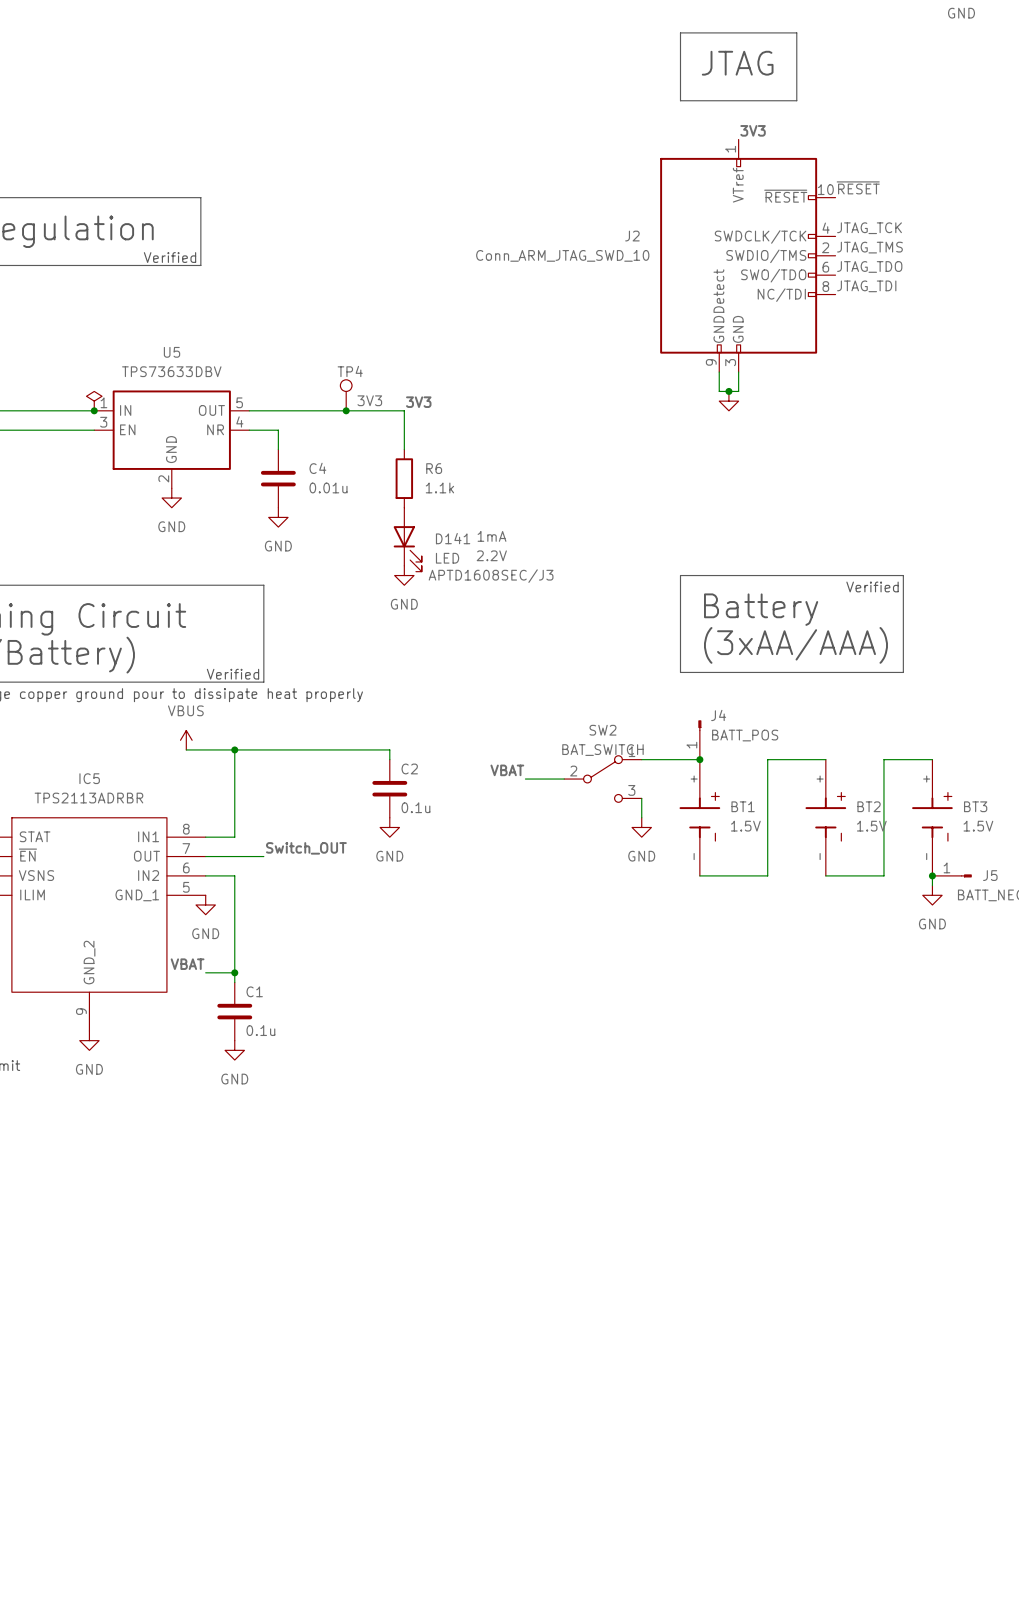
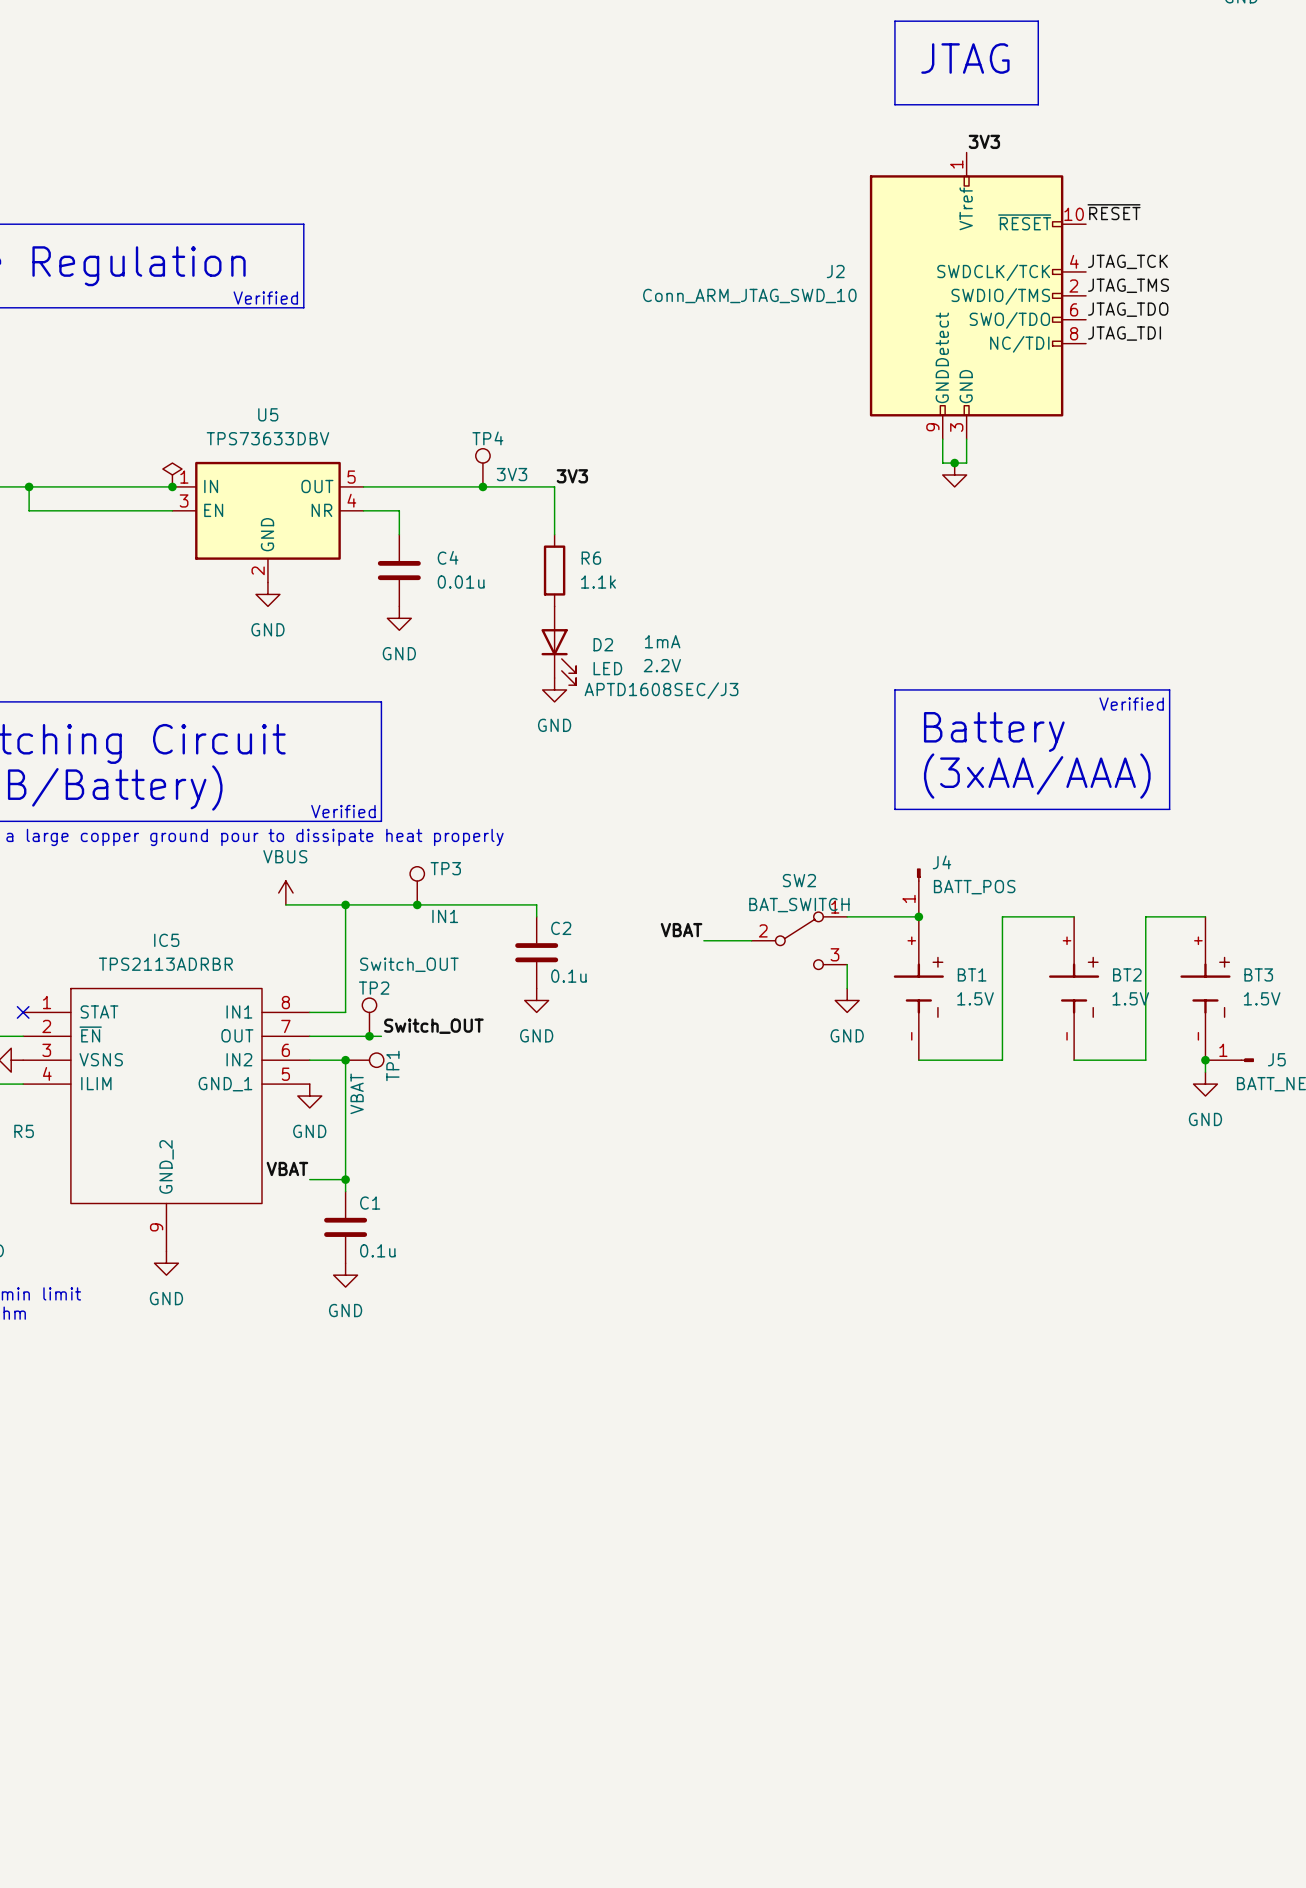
D141 name: D141 (453, 538) -> D2 (603, 644)
TP3: none -> IN1 (417, 885)
junction: none -> (417, 904)
TP2: none -> Switch_OUT (369, 1017)
junction: none -> (369, 1036)
junction: none -> (345, 1060)
TP1: none -> VBAT (364, 1060)

